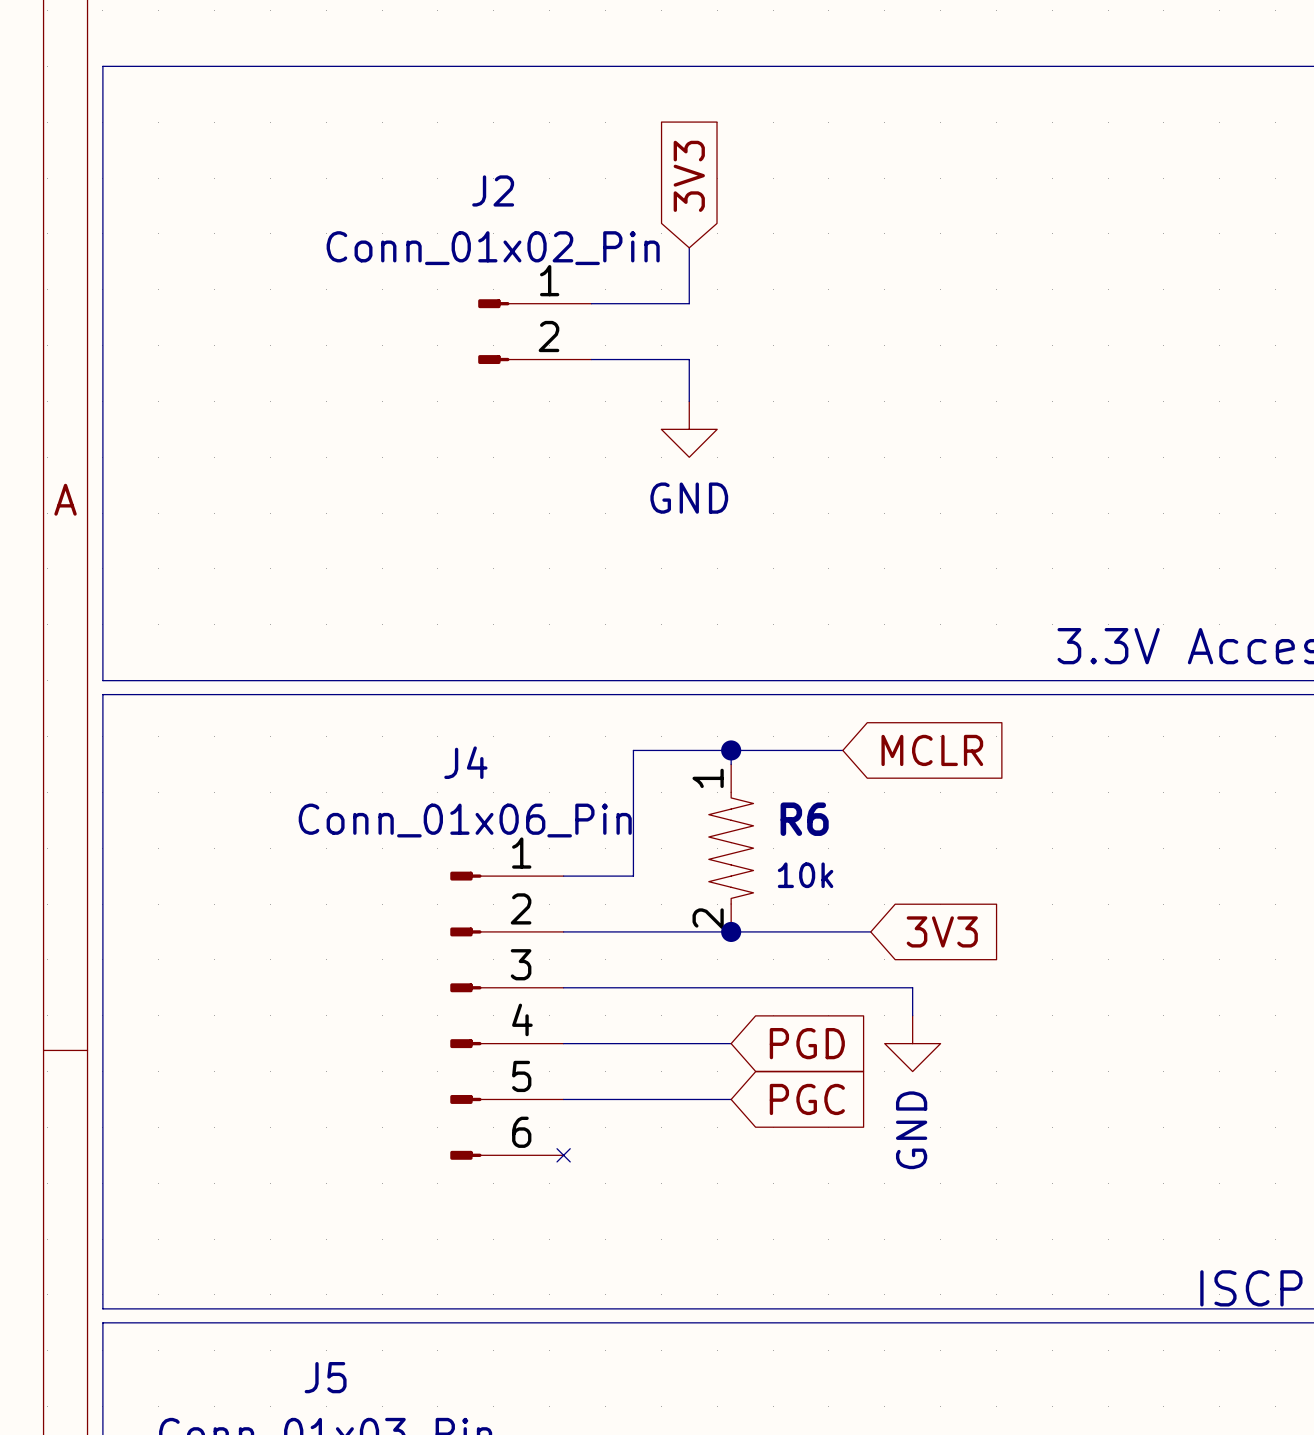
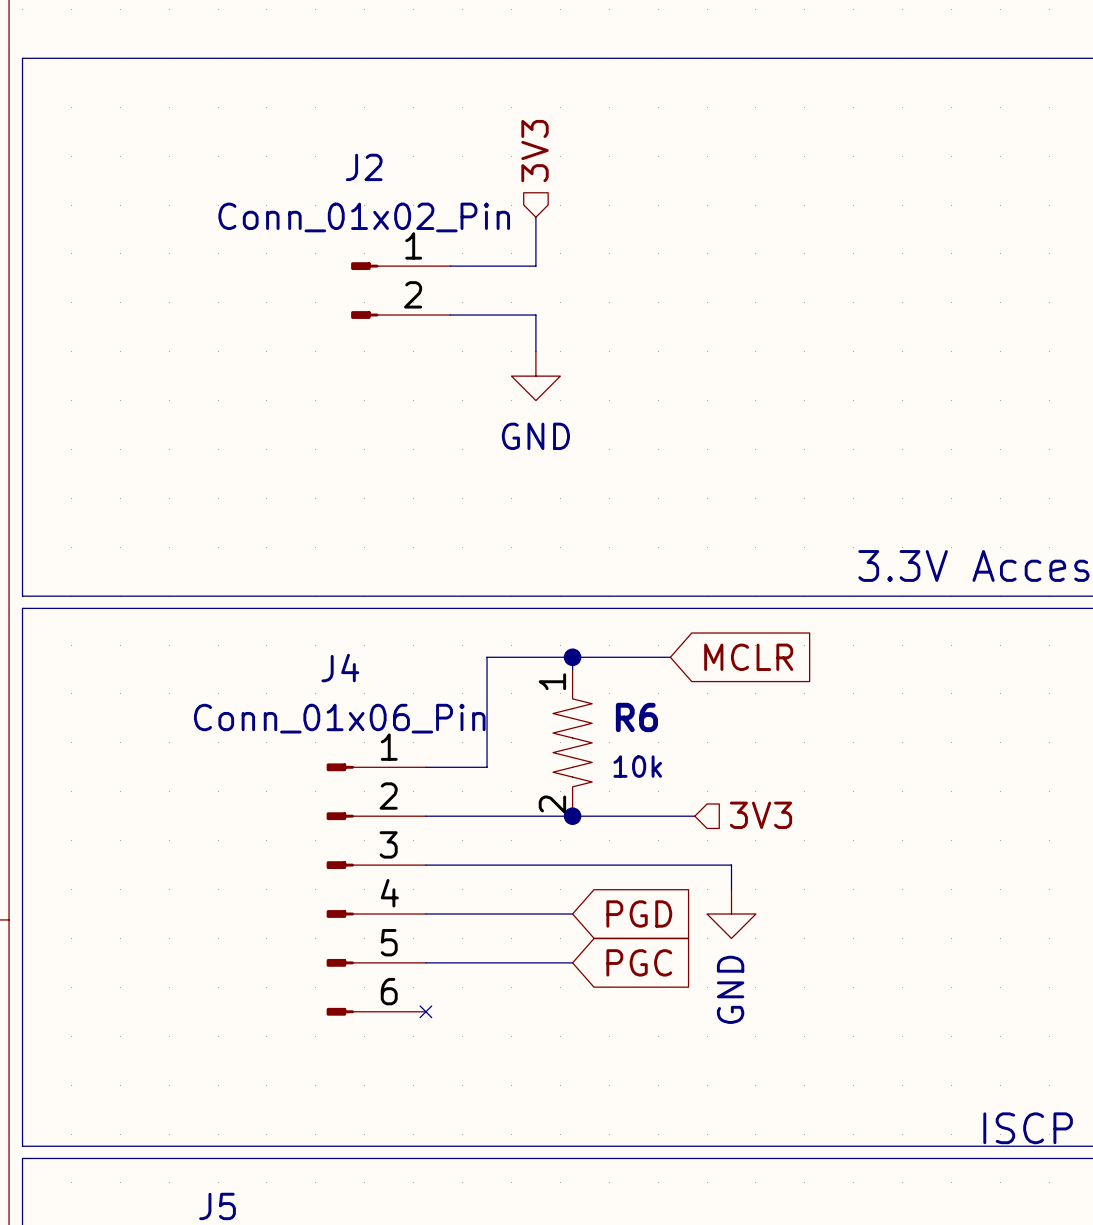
hierarchical label: none -> 3V3 (535, 151)
global label: 3V3 (689, 176) -> none
hierarchical label: none -> 3V3 (760, 815)
global label: 3V3 (942, 931) -> none

